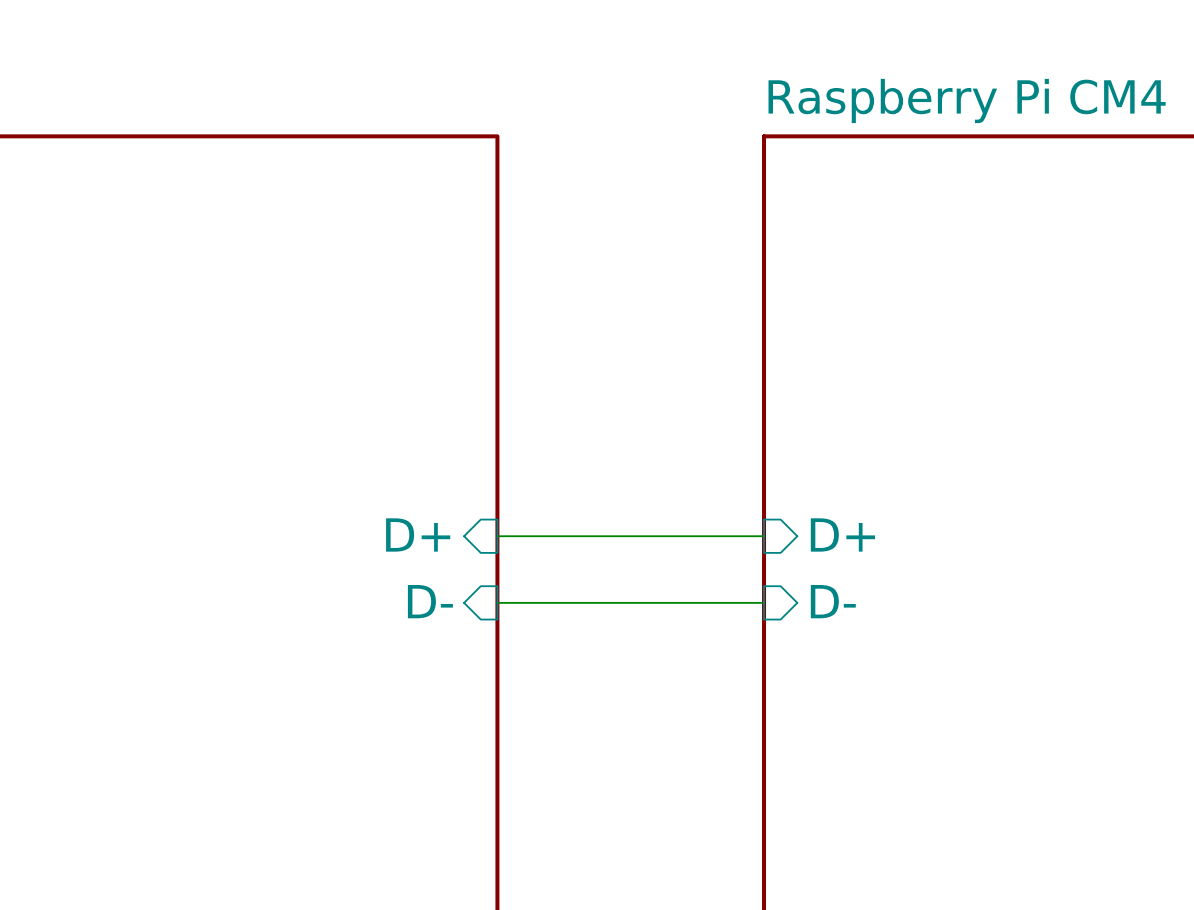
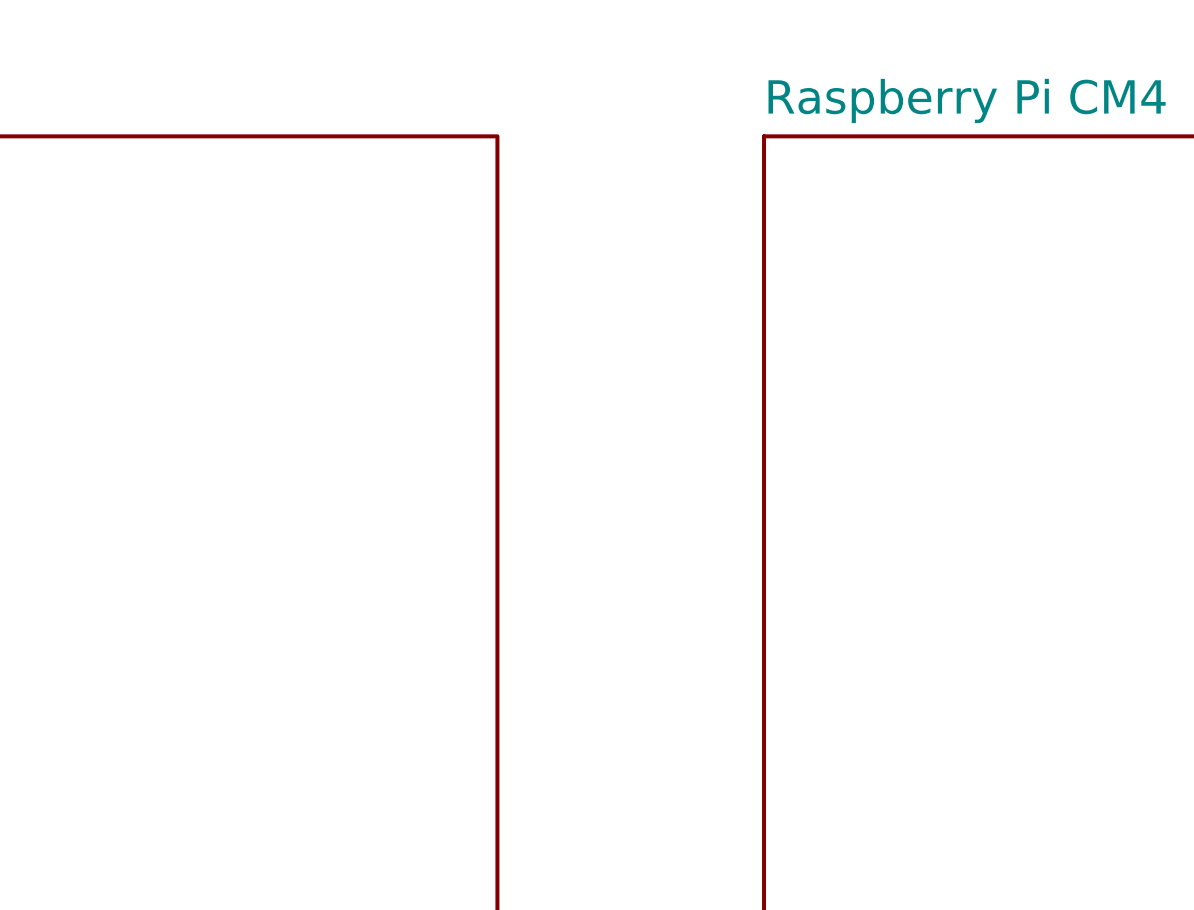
sheet pin: D+ (418, 534) -> none
sheet pin: D+ (842, 534) -> none
wire: (497, 536) (764, 536) -> none
sheet pin: D- (430, 601) -> none
sheet pin: D- (833, 601) -> none
wire: (497, 602) (764, 602) -> none

